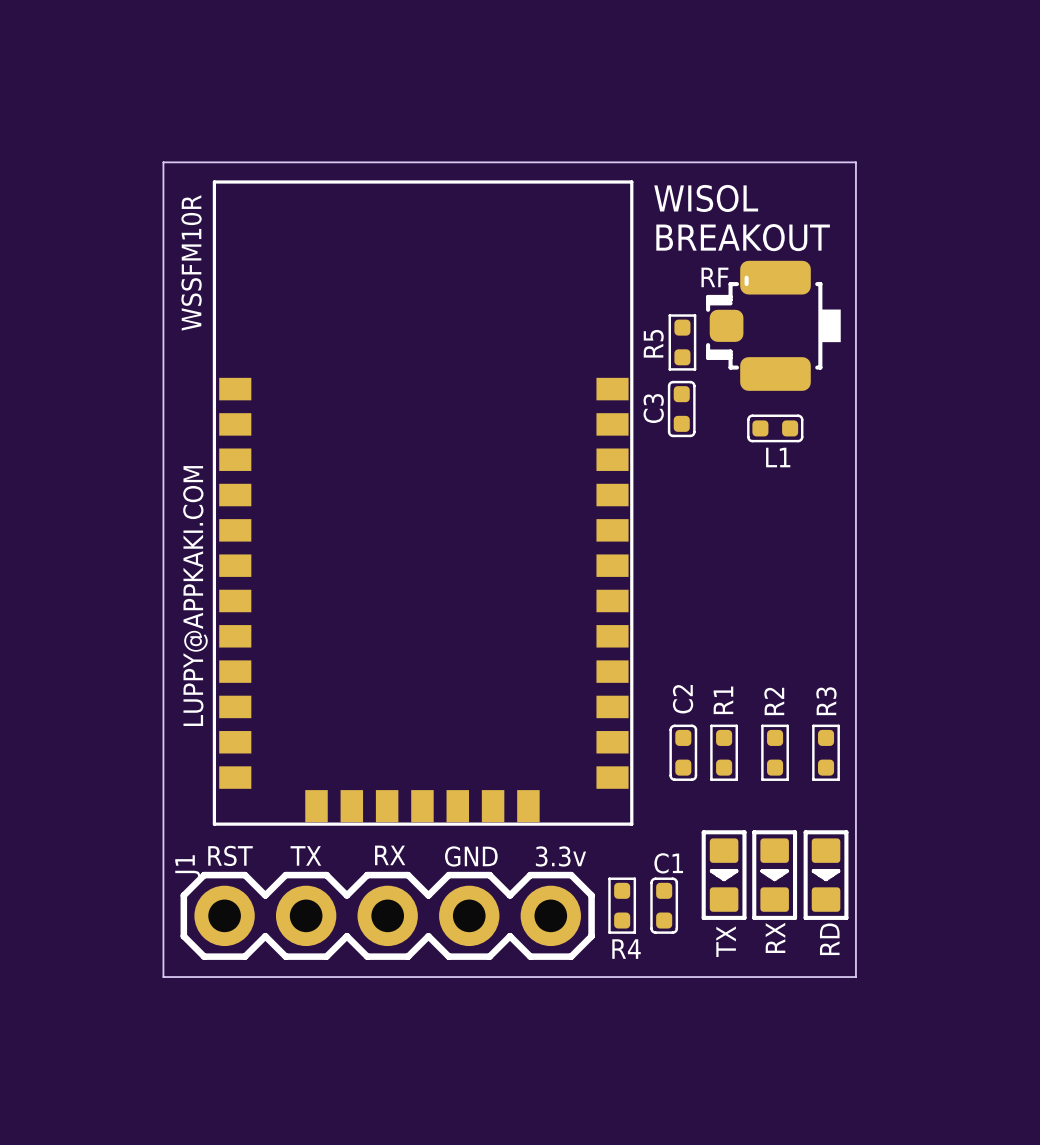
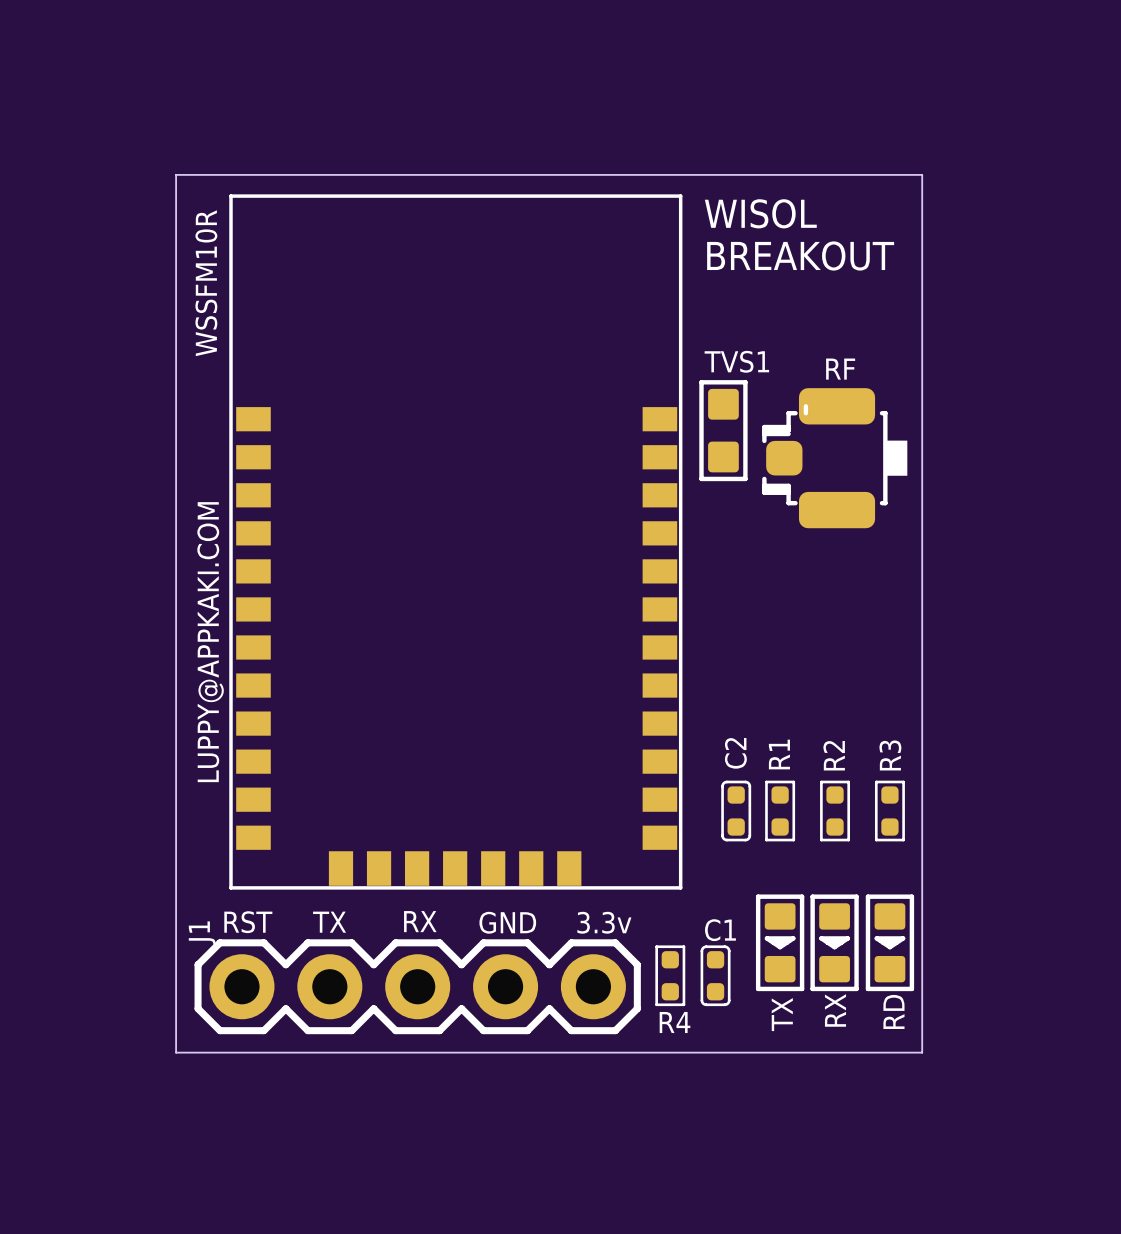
RF name position: RF (714, 277) -> RF (840, 369)
RF position: (773, 325) -> (834, 458)
R5: (682, 342) -> none
TVS1: none -> (723, 430)
C3: (681, 409) -> none
L1: (775, 428) -> none

